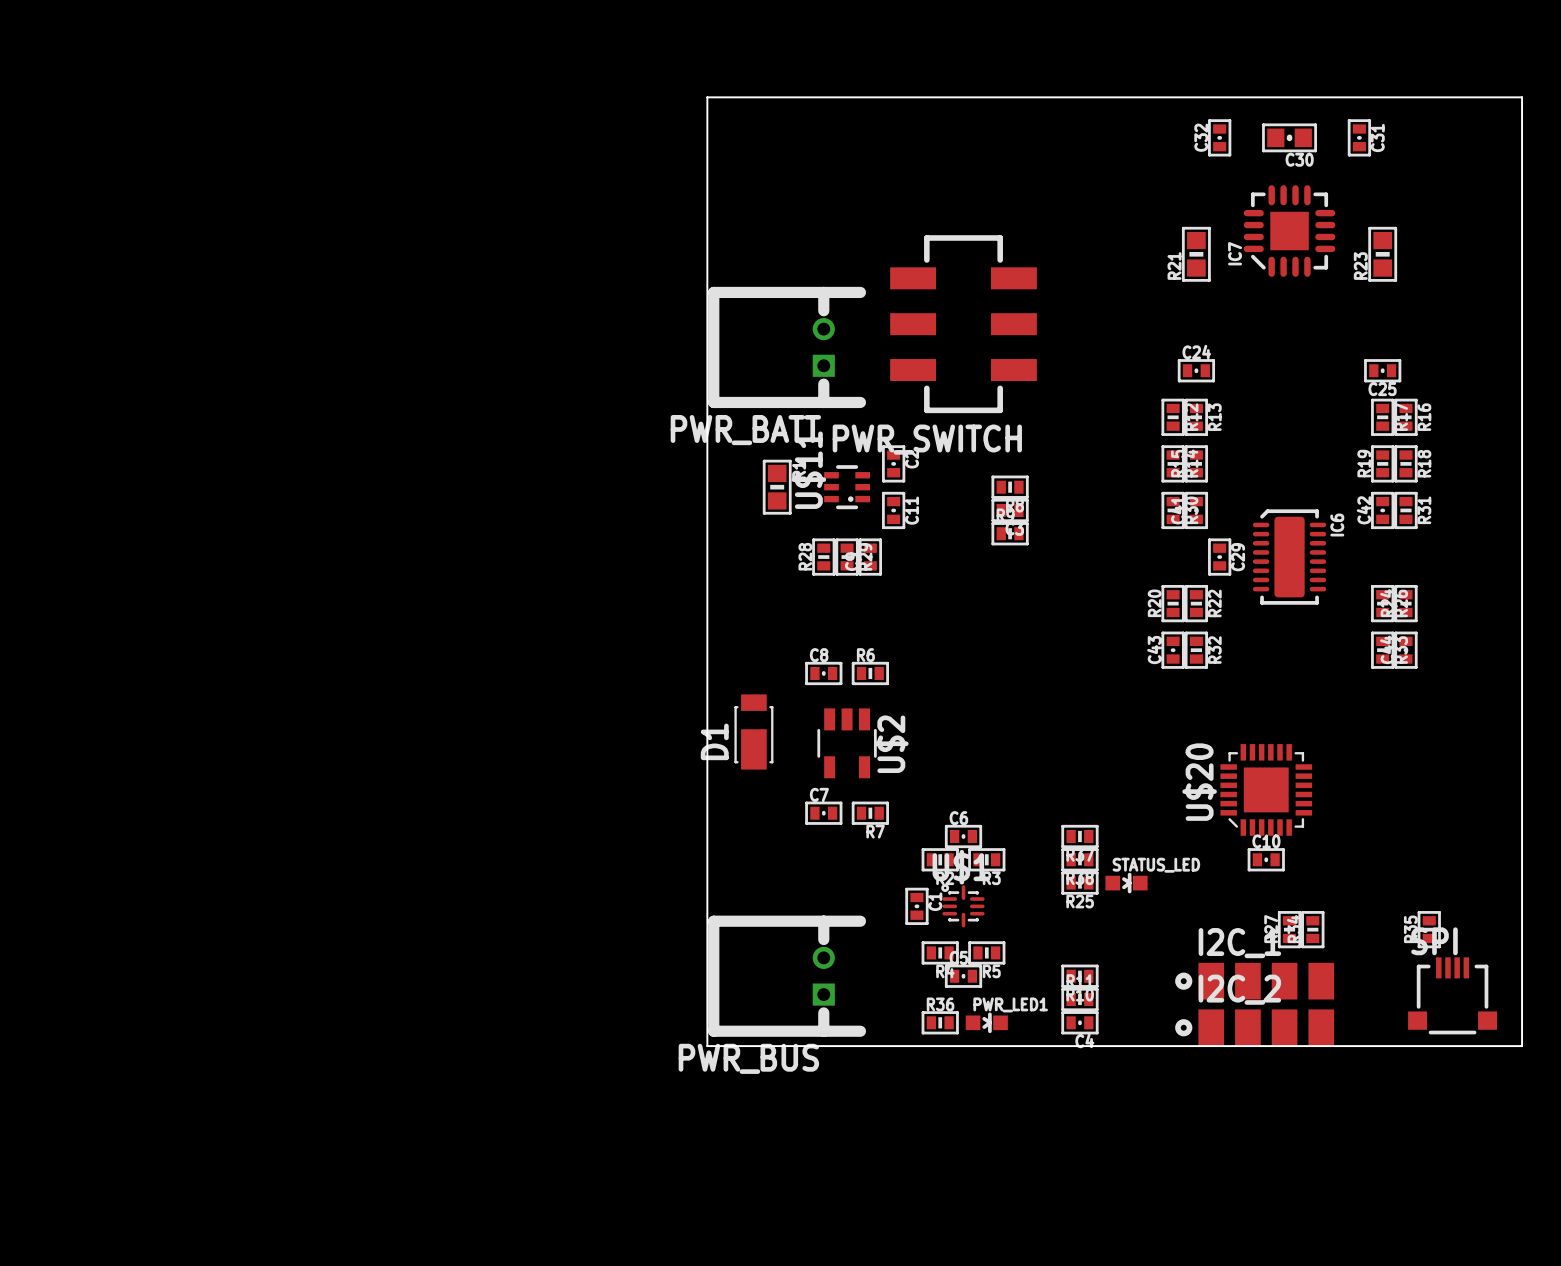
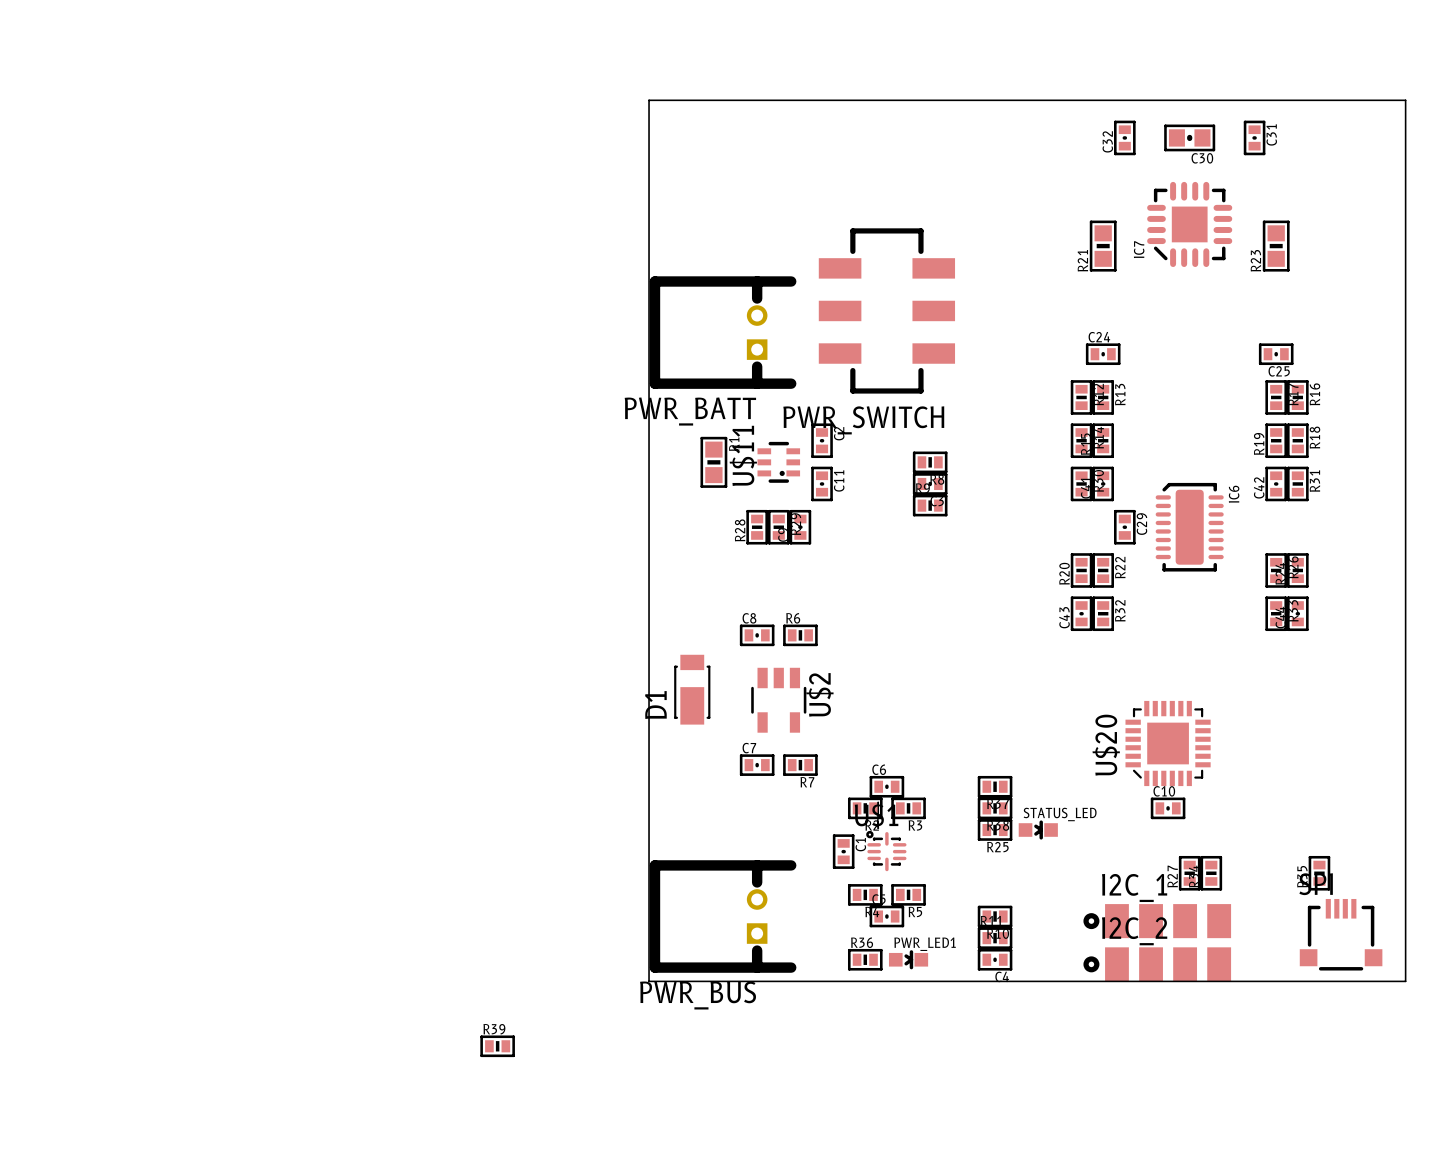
R39: none -> (497, 1046)

